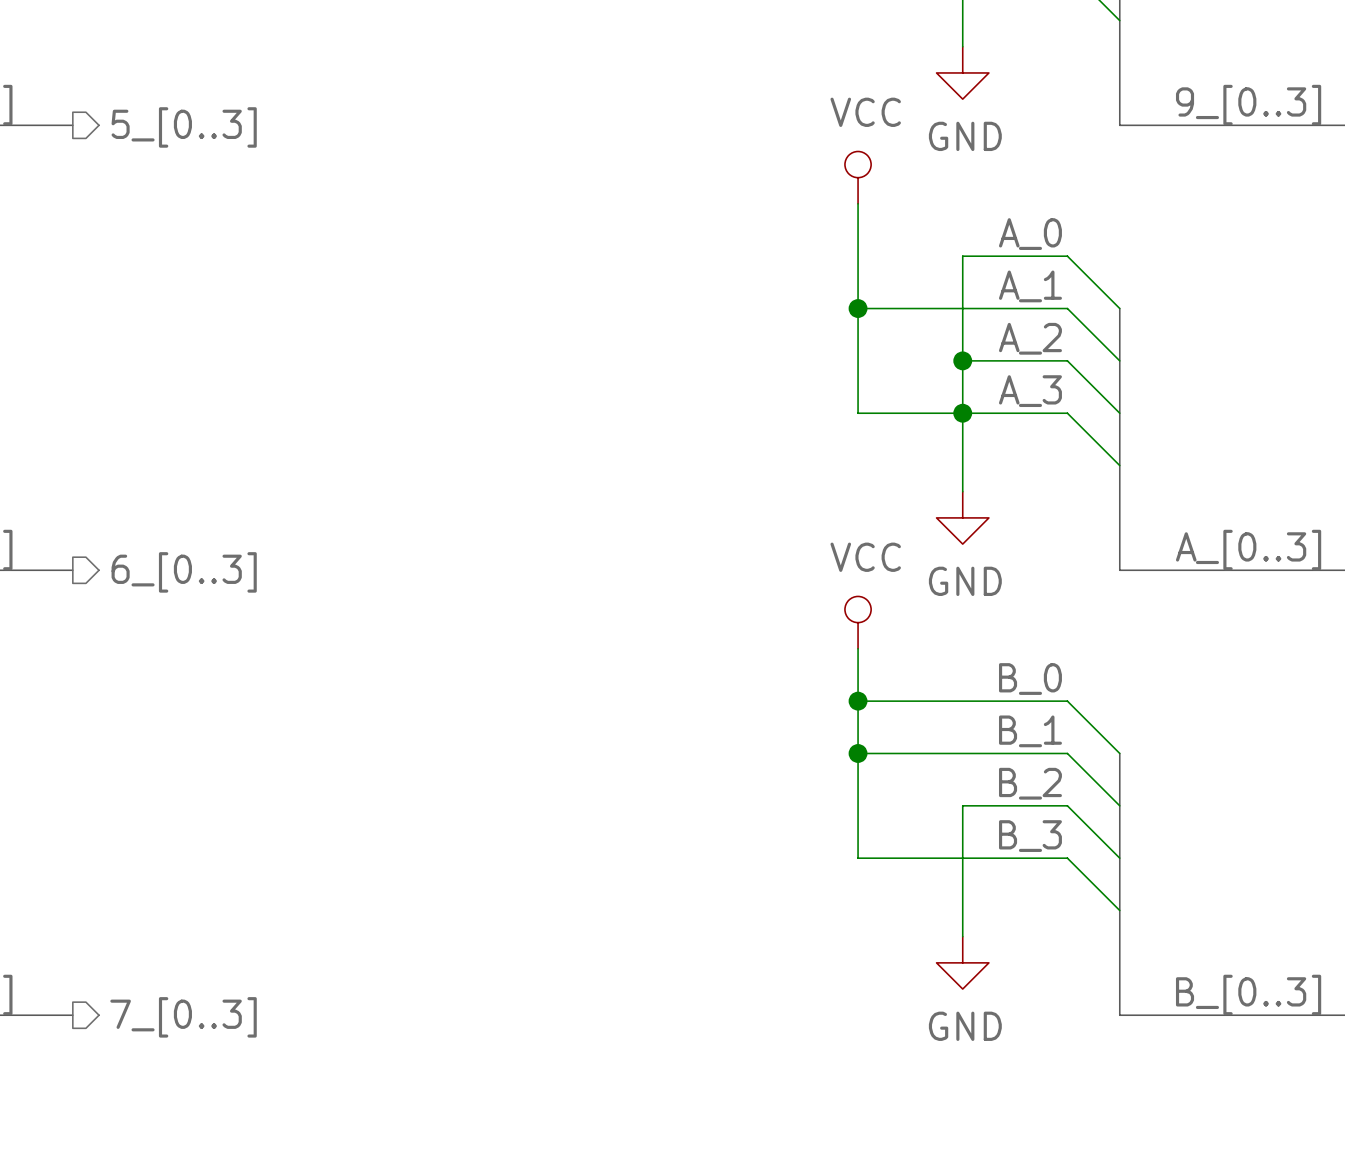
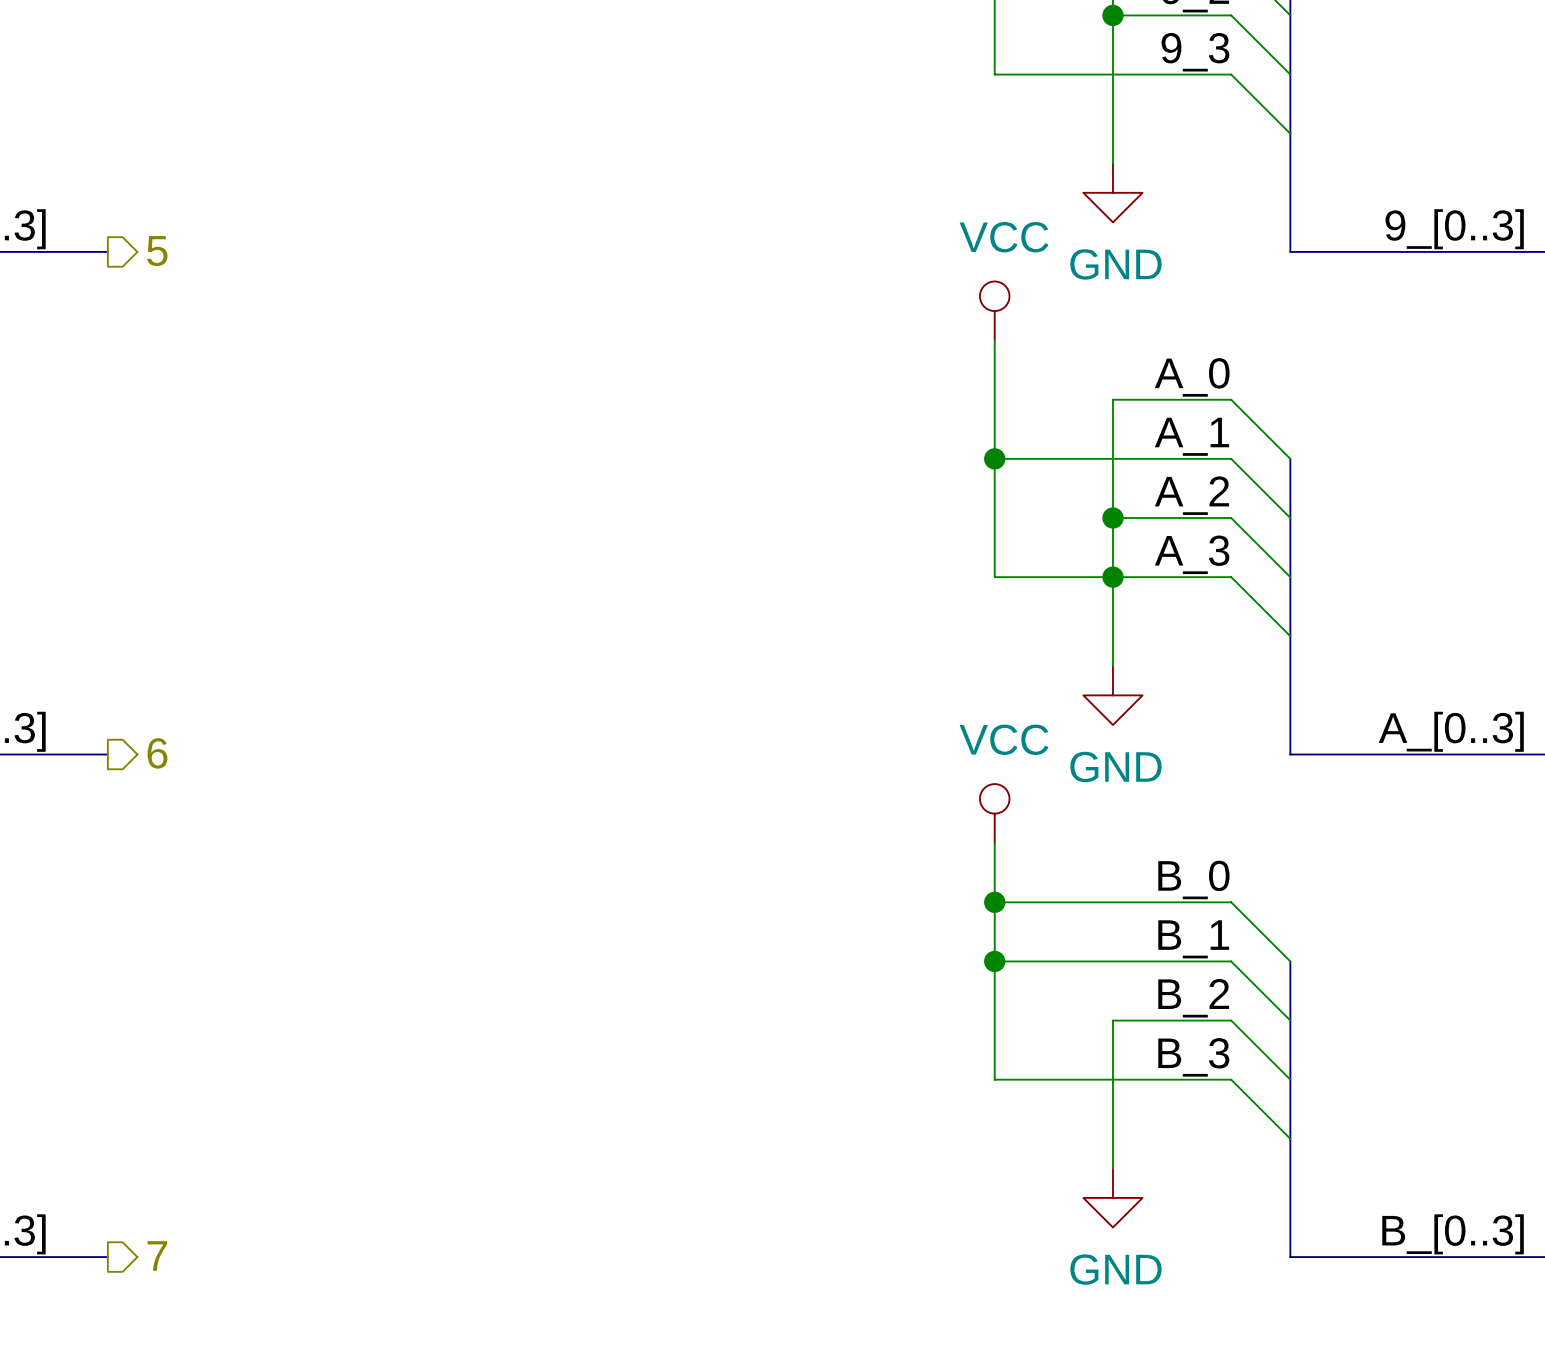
hierarchical label: 5_[0..3] (184, 127) -> 5 (157, 251)
hierarchical label: 6_[0..3] (184, 572) -> 6 (157, 753)
hierarchical label: 7_[0..3] (183, 1017) -> 7 (157, 1255)

